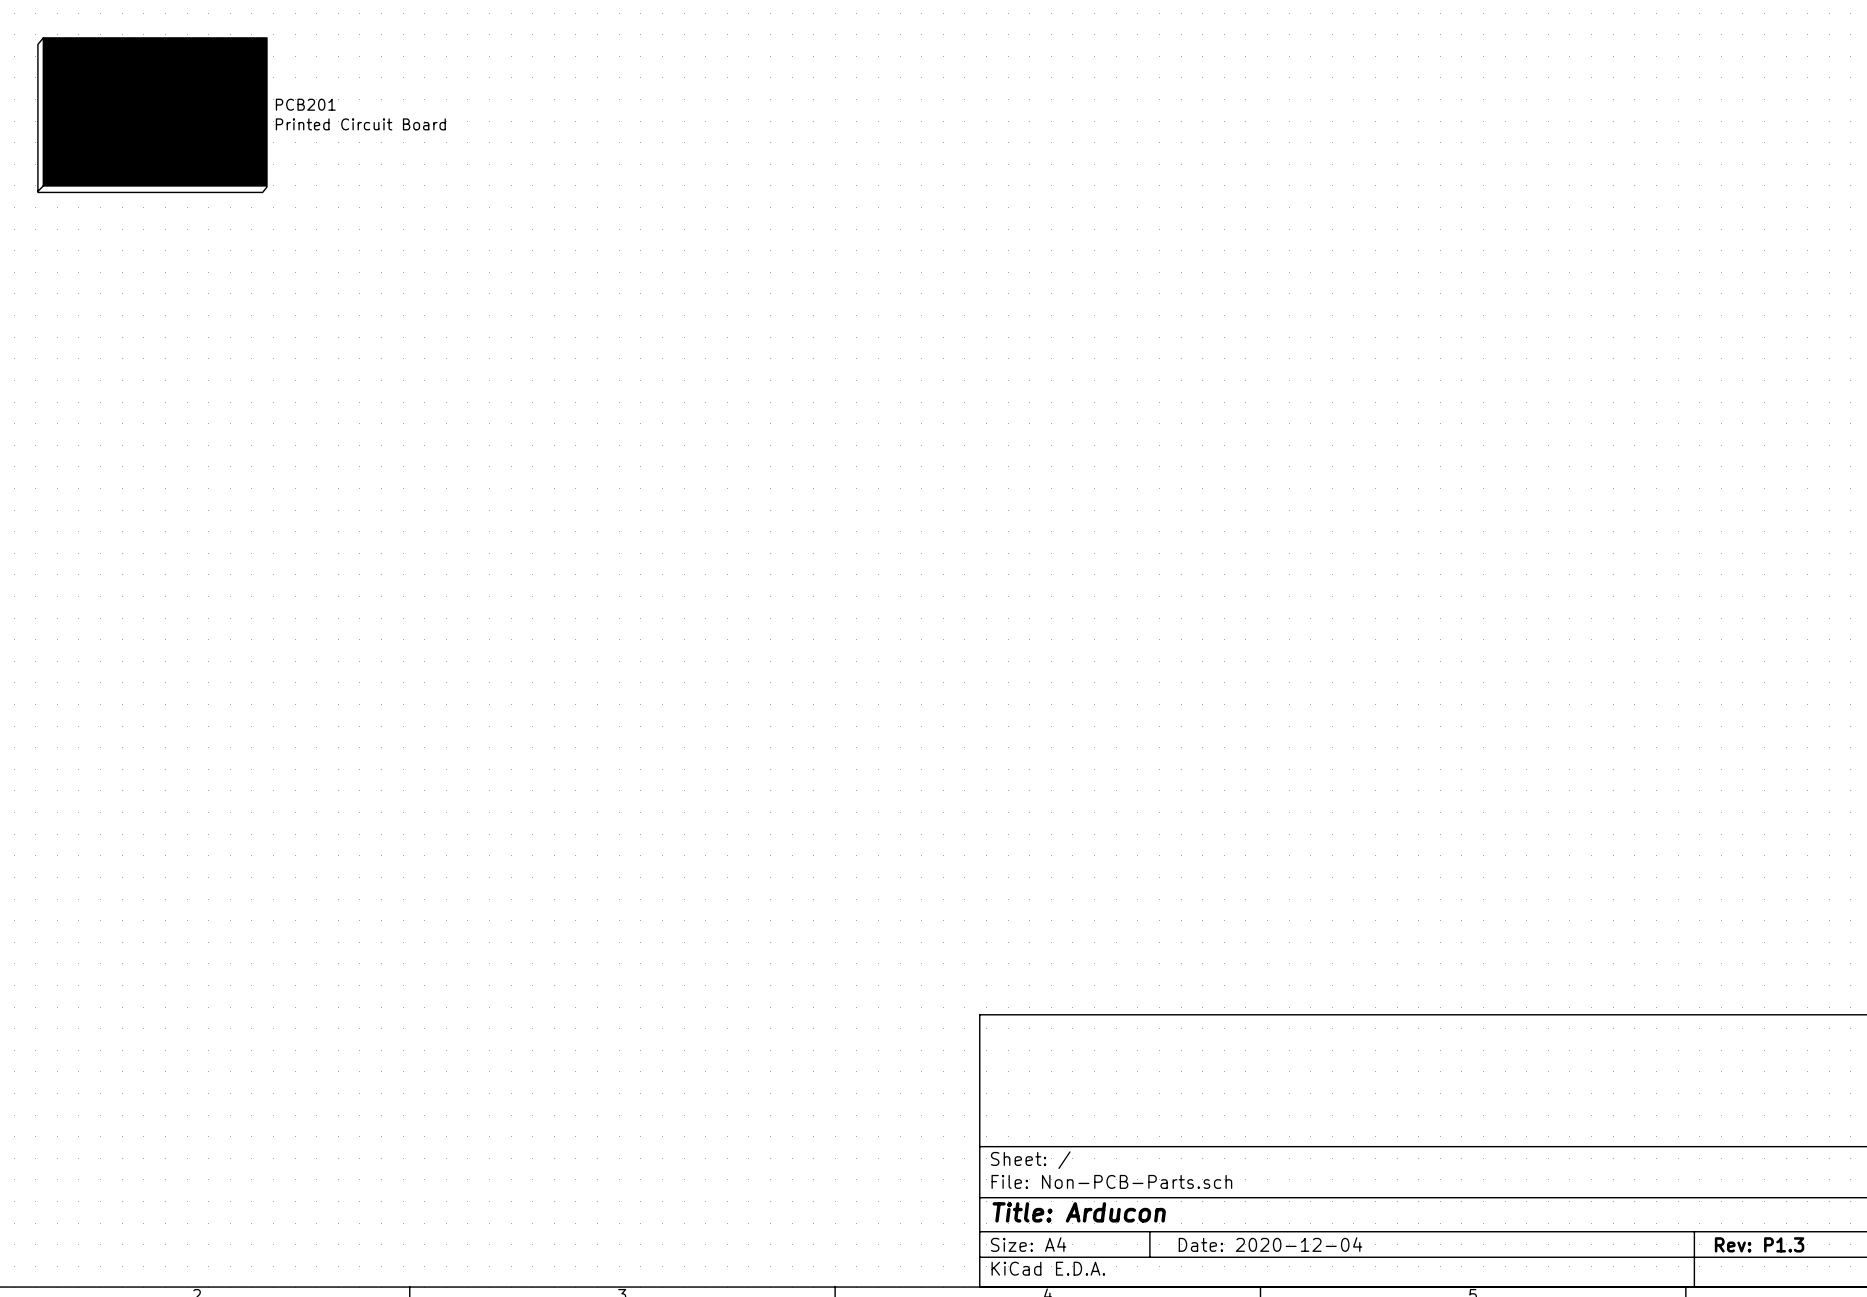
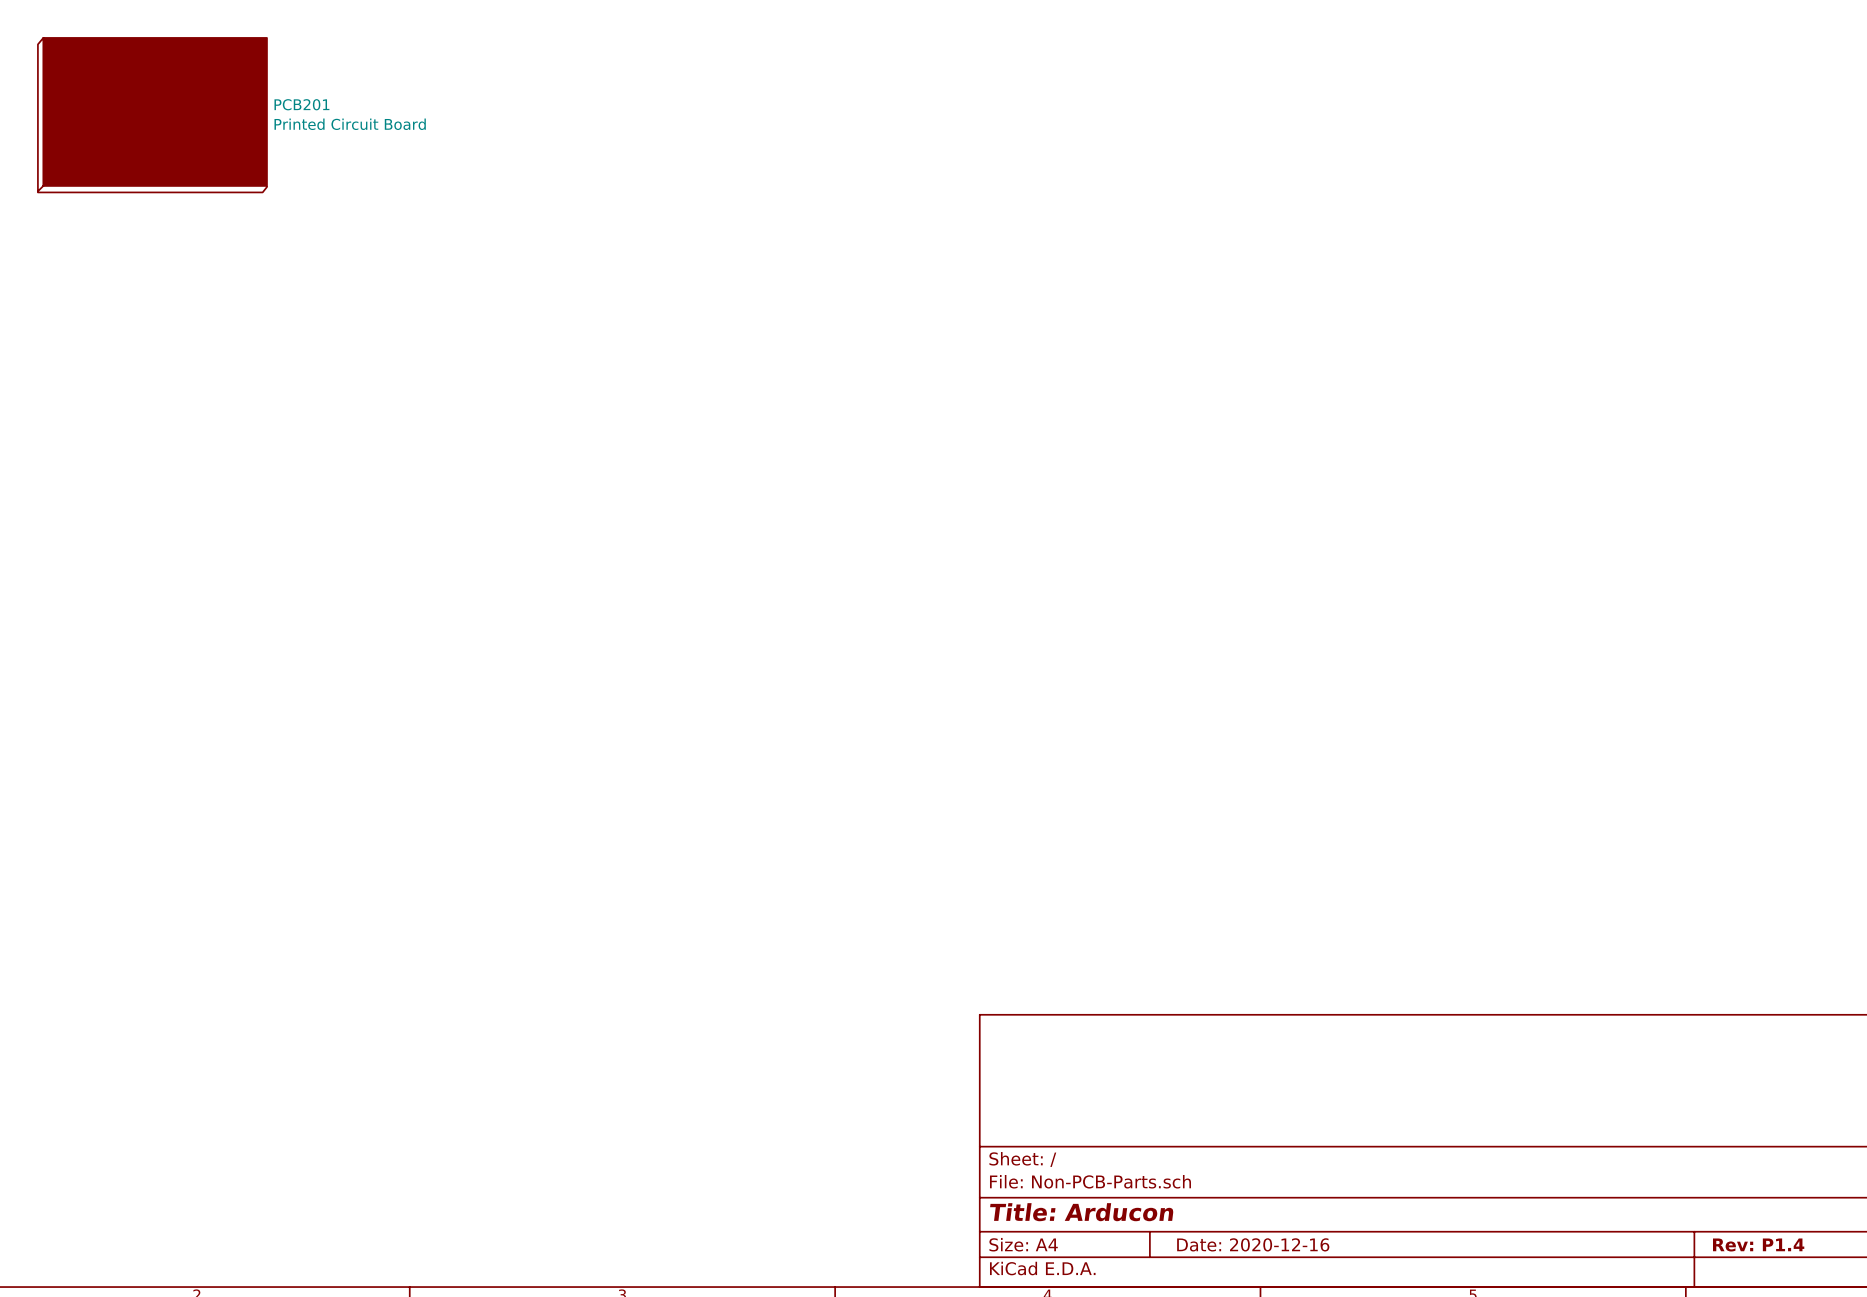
title block: Date: 2020-12-04 (1270, 1244) -> Date: 2020-12-16 (1253, 1244)
title block: Rev: P1.3 (1759, 1244) -> Rev: P1.4 (1758, 1244)

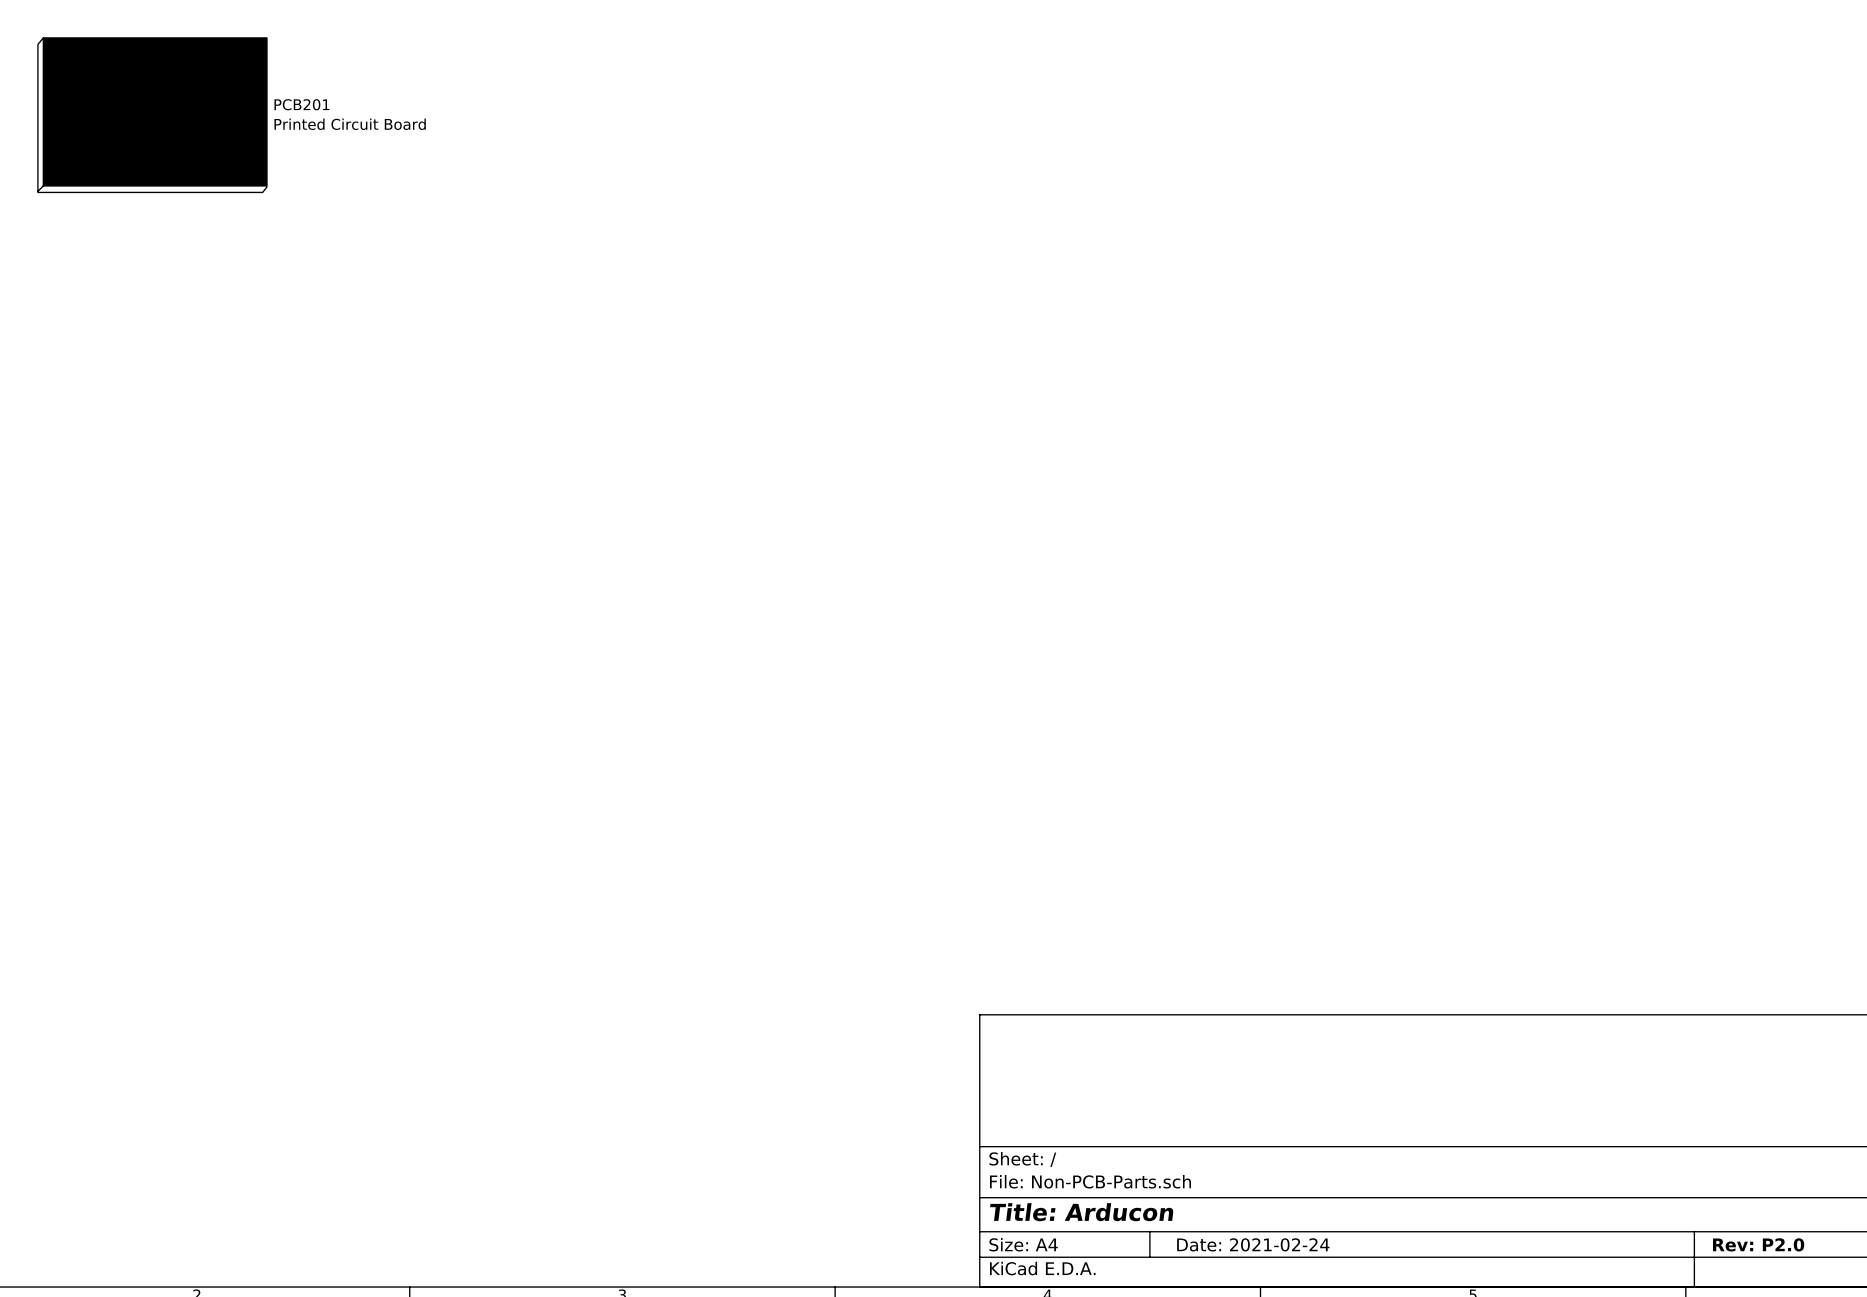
title block: Date: 2020-12-16 (1253, 1244) -> Date: 2021-02-24 (1253, 1244)
title block: Rev: P1.4 (1758, 1244) -> Rev: P2.0 (1758, 1244)

